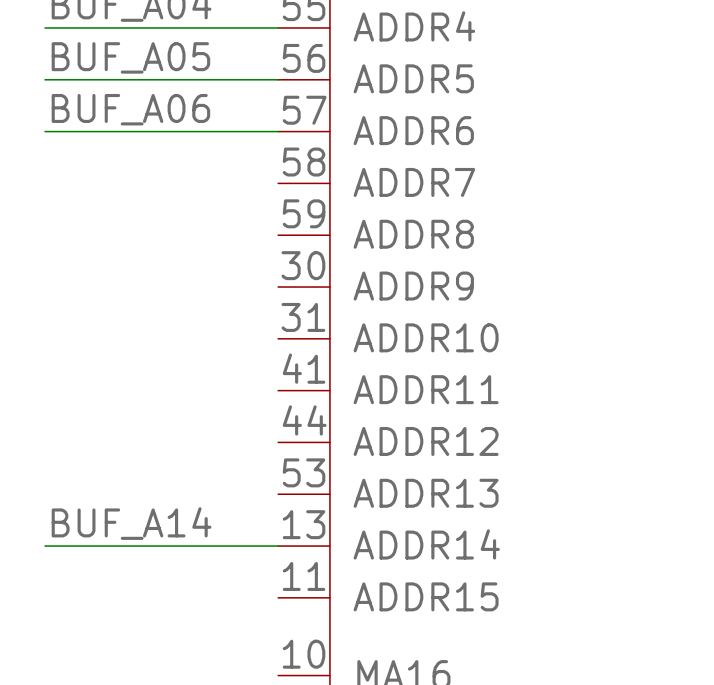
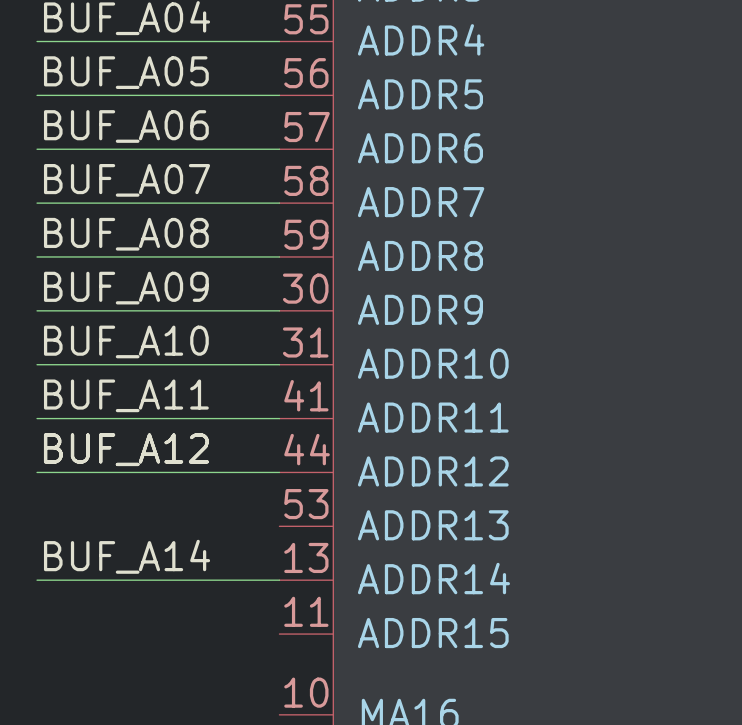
label: none -> BUF_A07 (127, 180)
wire: none -> (37, 203) (279, 203)
label: none -> BUF_A08 (126, 234)
wire: none -> (37, 256) (279, 256)
label: none -> BUF_A09 (126, 288)
wire: none -> (37, 310) (279, 310)
label: none -> BUF_A10 (126, 341)
wire: none -> (37, 364) (279, 364)
label: none -> BUF_A11 (126, 395)
wire: none -> (37, 418) (279, 418)
label: none -> BUF_A12 (126, 449)
wire: none -> (37, 472) (279, 472)

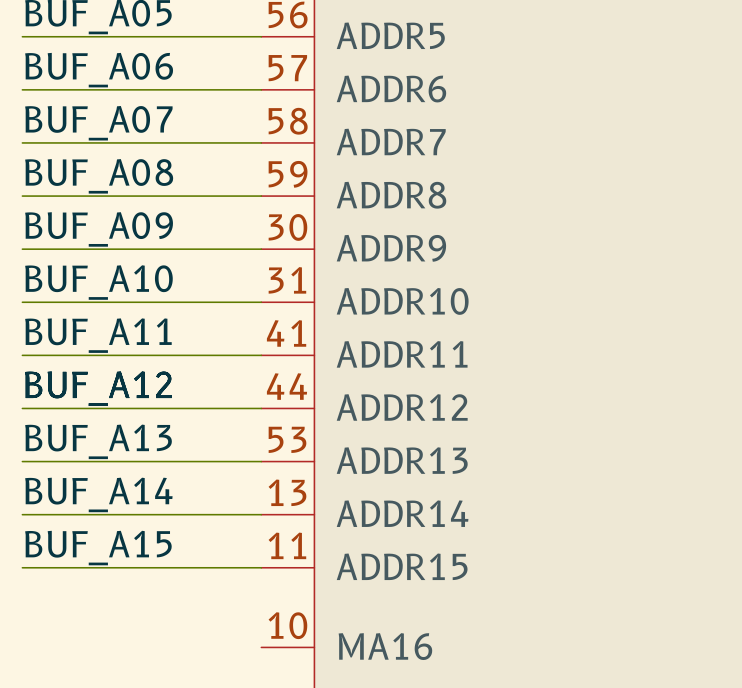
label: none -> BUF_A13 (98, 441)
wire: none -> (22, 461) (261, 461)
label: none -> BUF_A15 (98, 548)
wire: none -> (22, 567) (261, 567)

